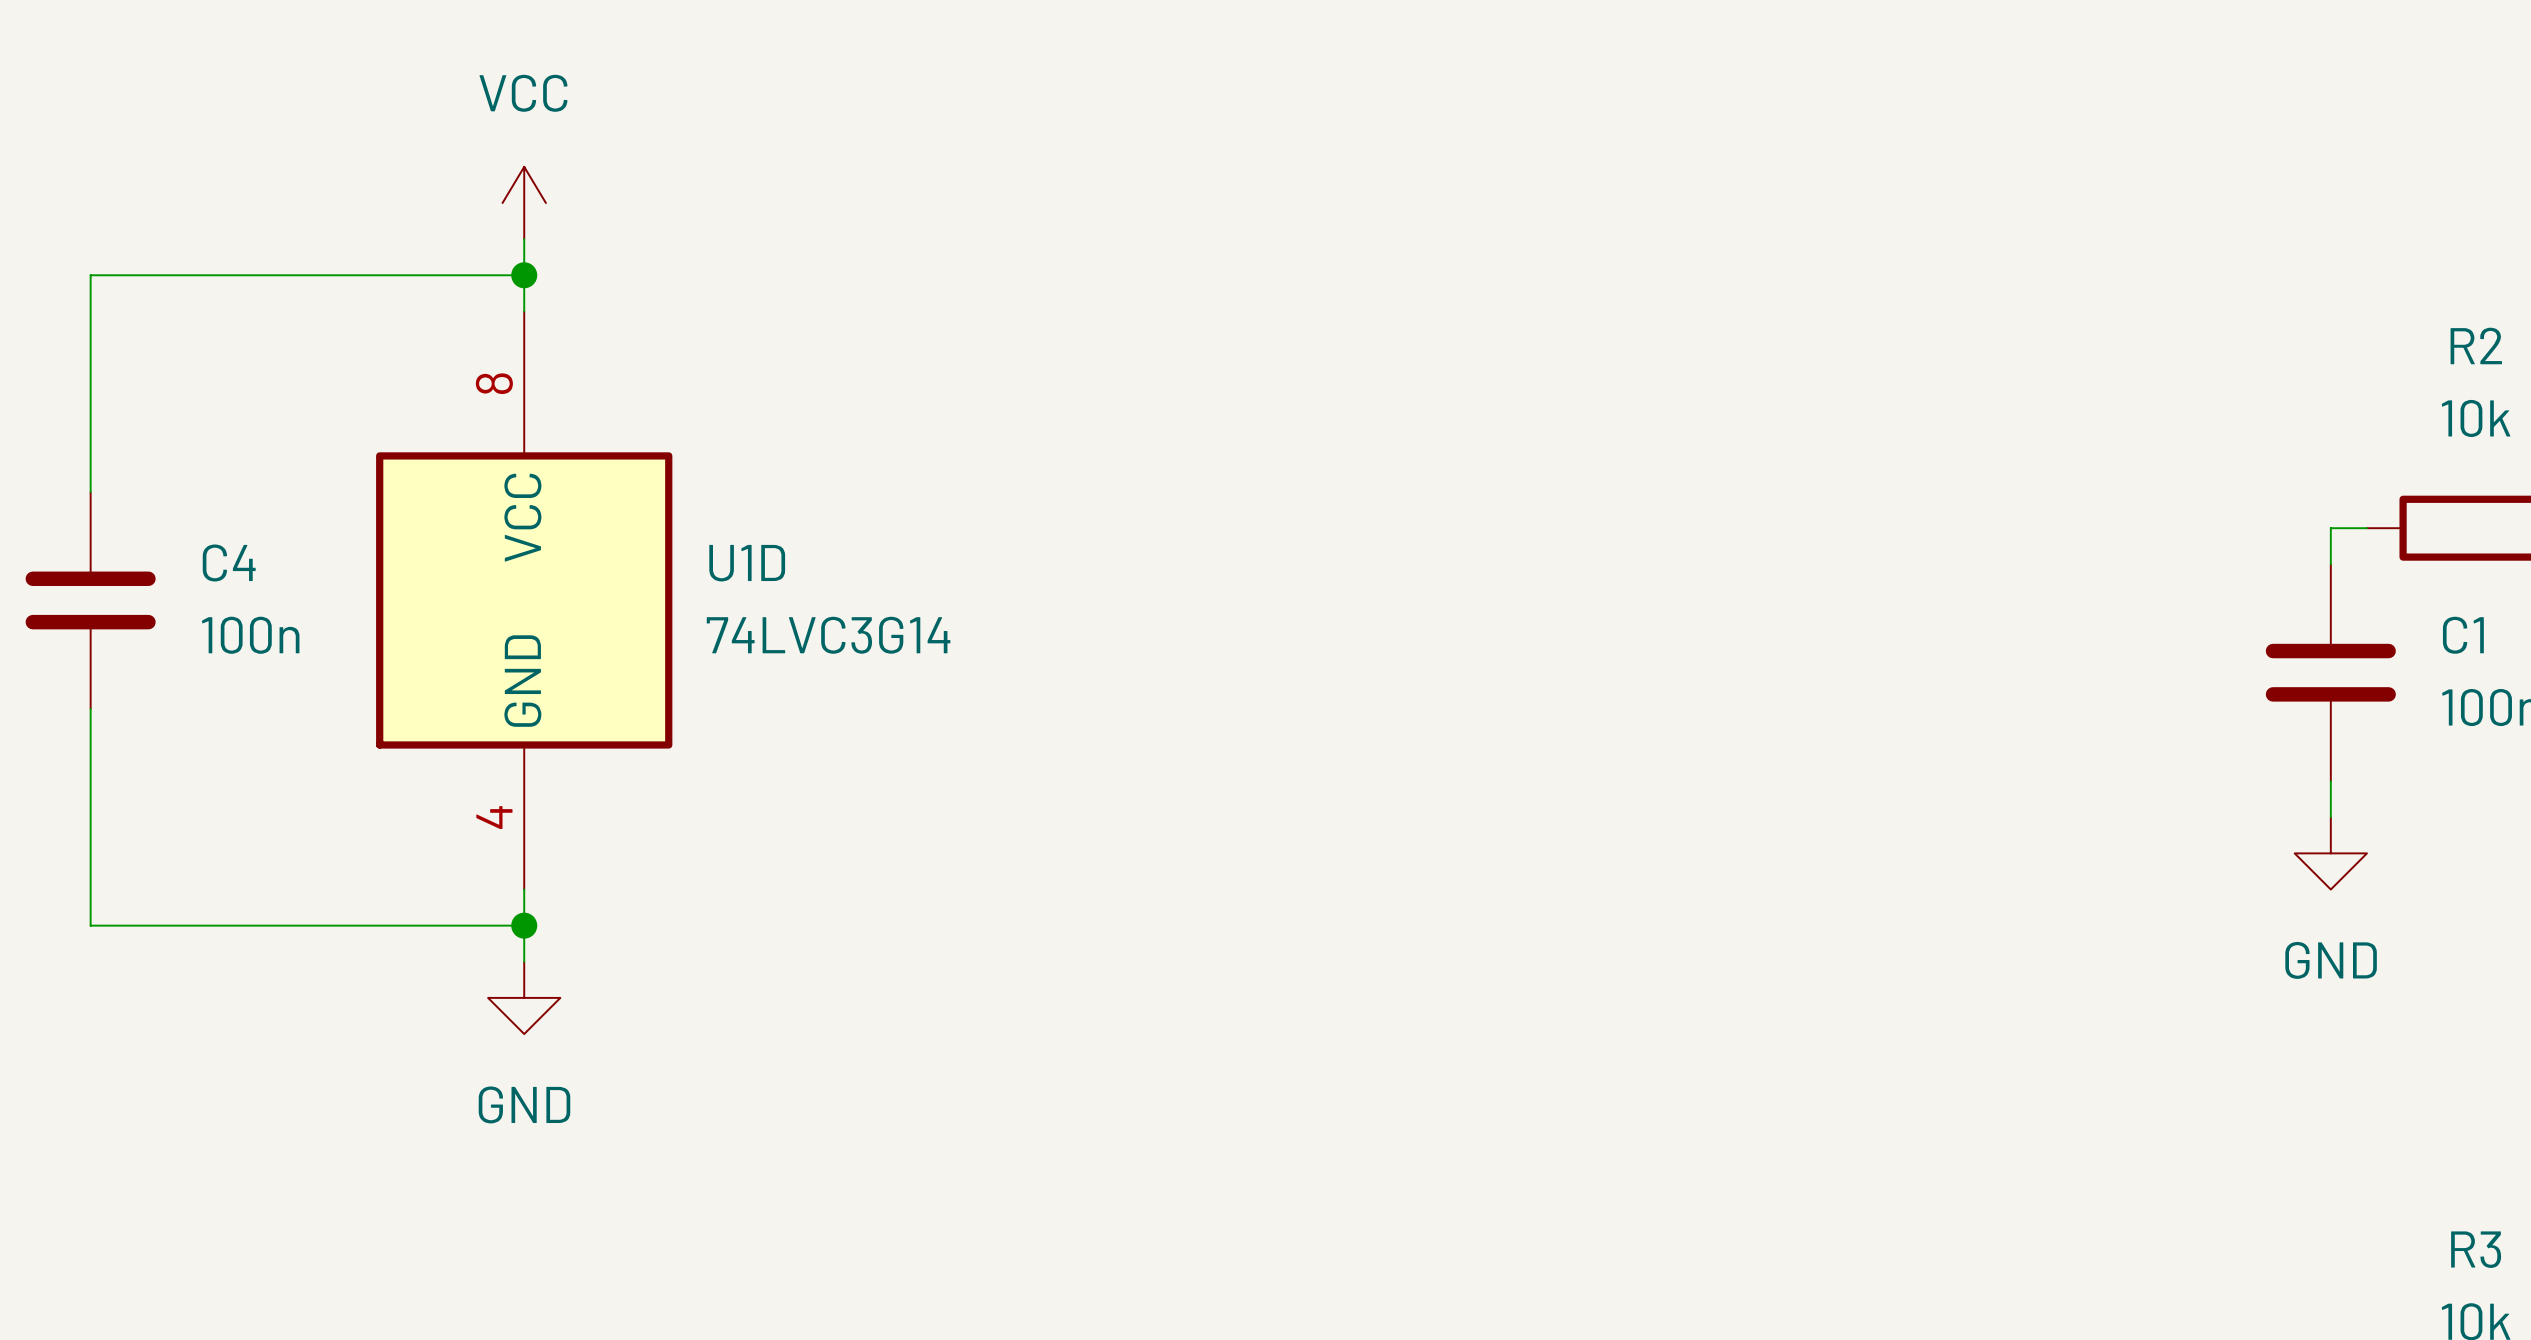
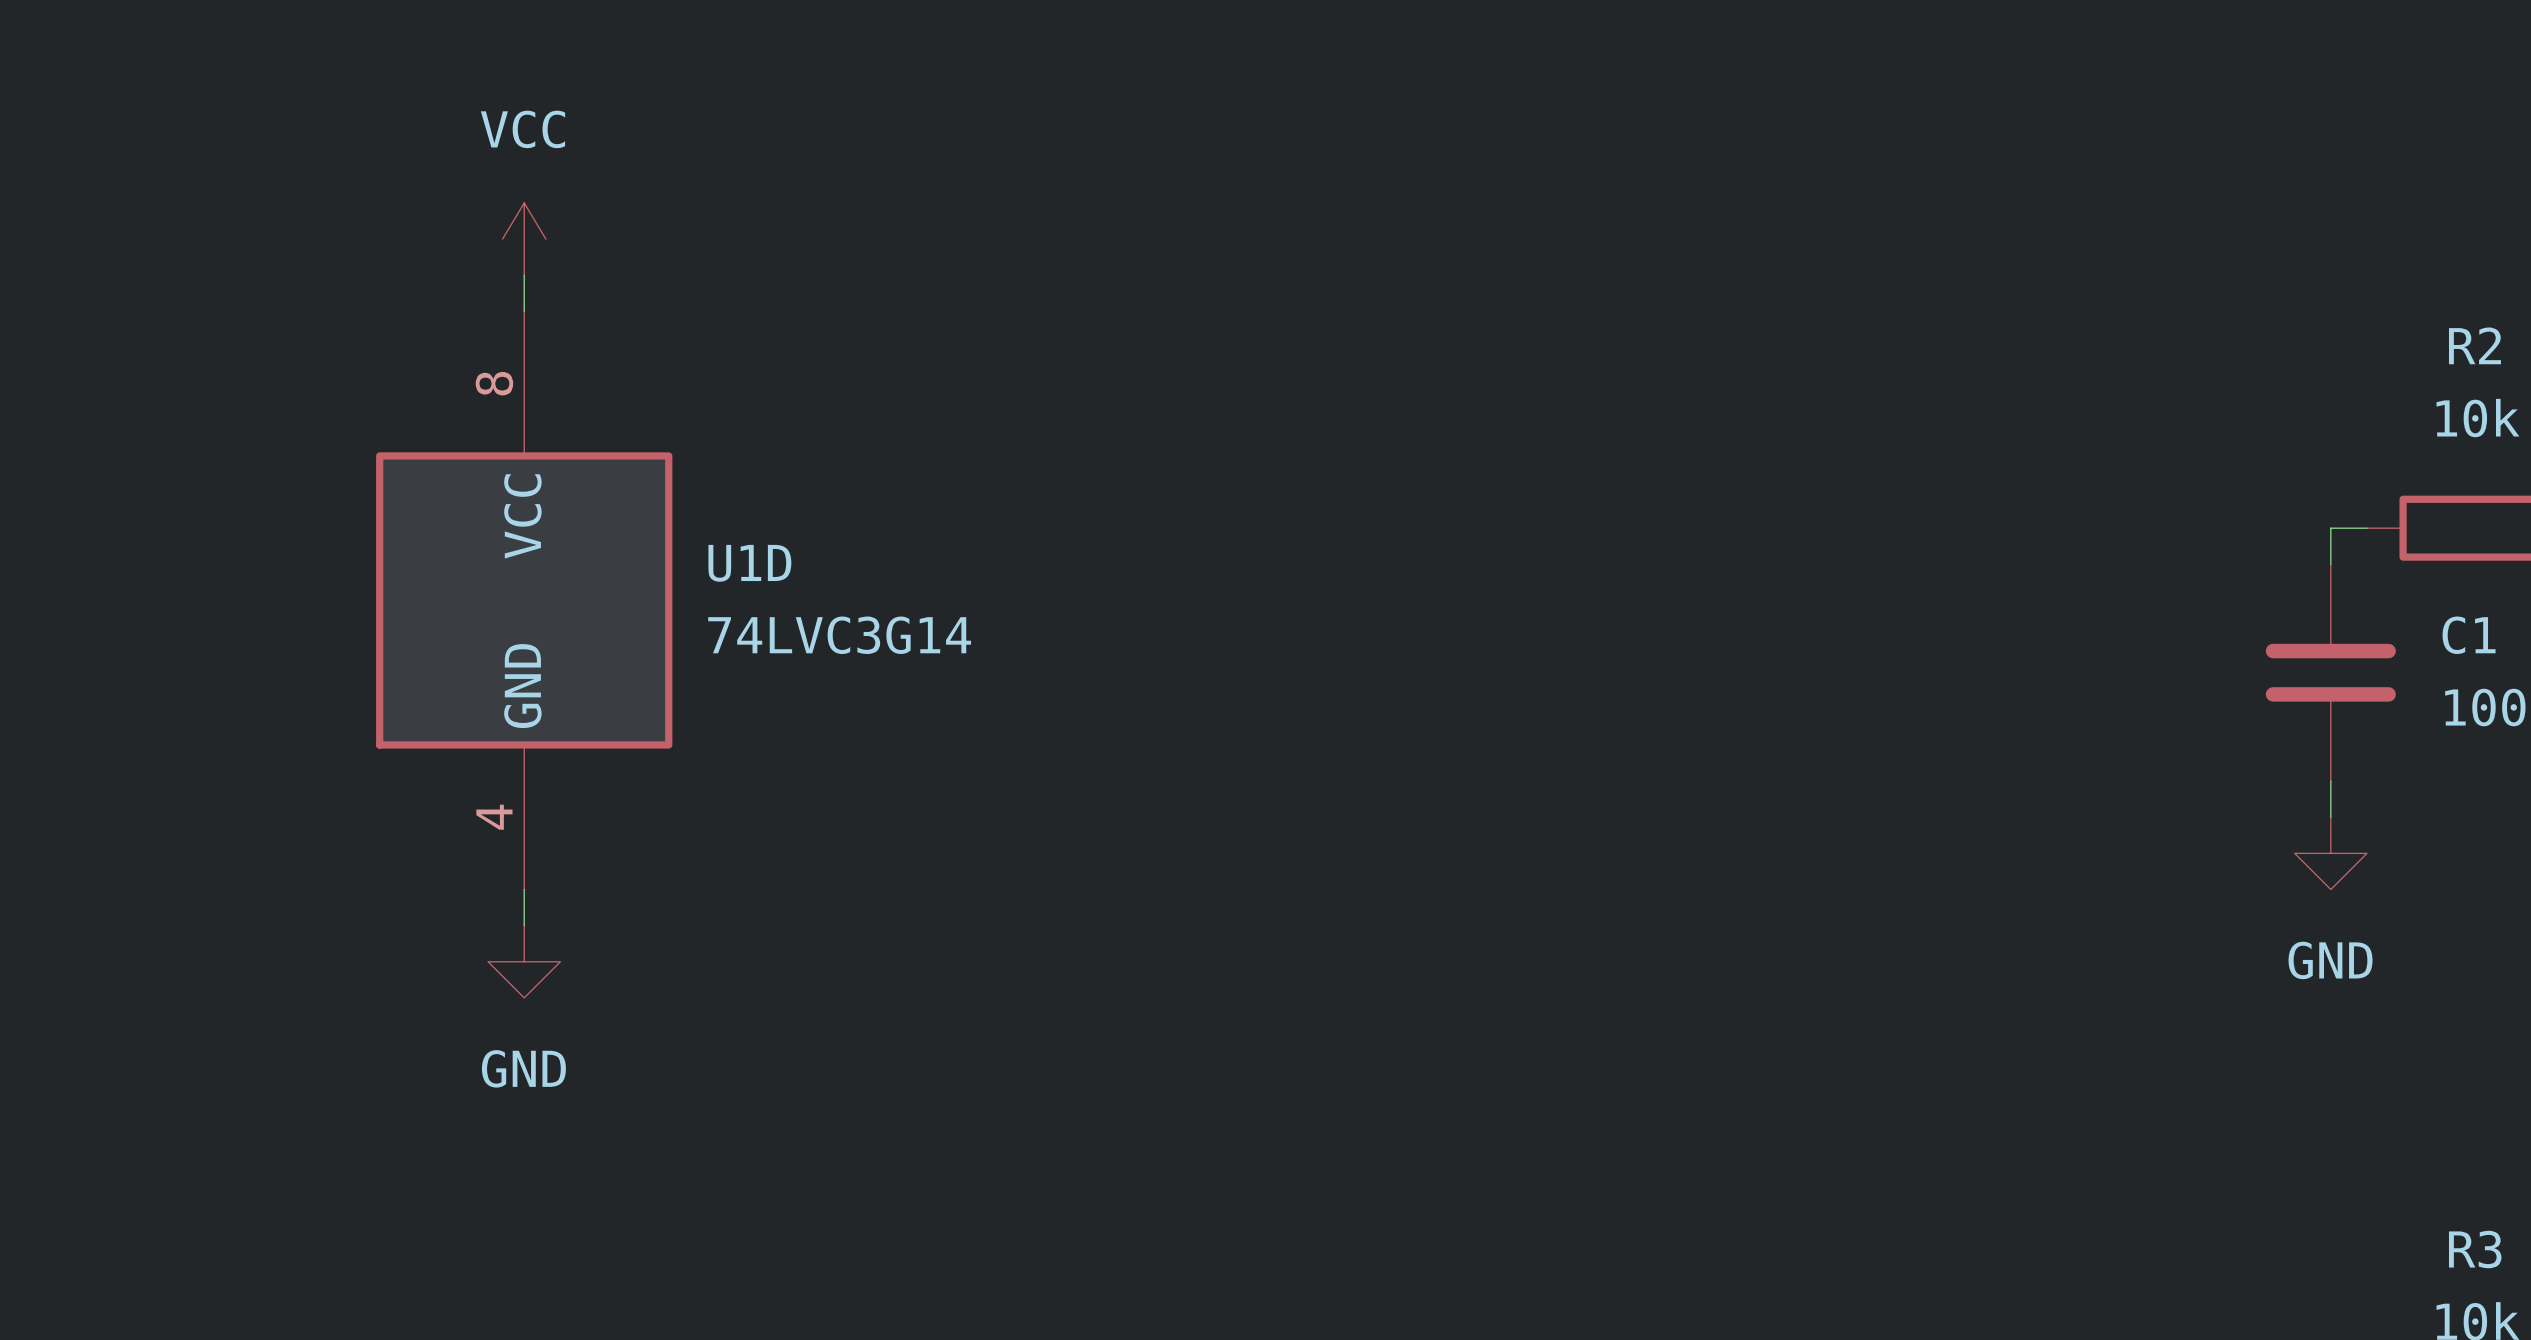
power symbol position: VCC (524, 203) -> VCC (524, 239)
wire: (524, 239) (524, 275) (90, 275) (90, 492) -> none
junction: (524, 275) -> none
C4: 100n (90, 600) -> none
wire: (90, 708) (90, 925) (524, 925) (524, 961) -> none
junction: (524, 925) -> none
power symbol position: GND (524, 997) -> GND (524, 961)

